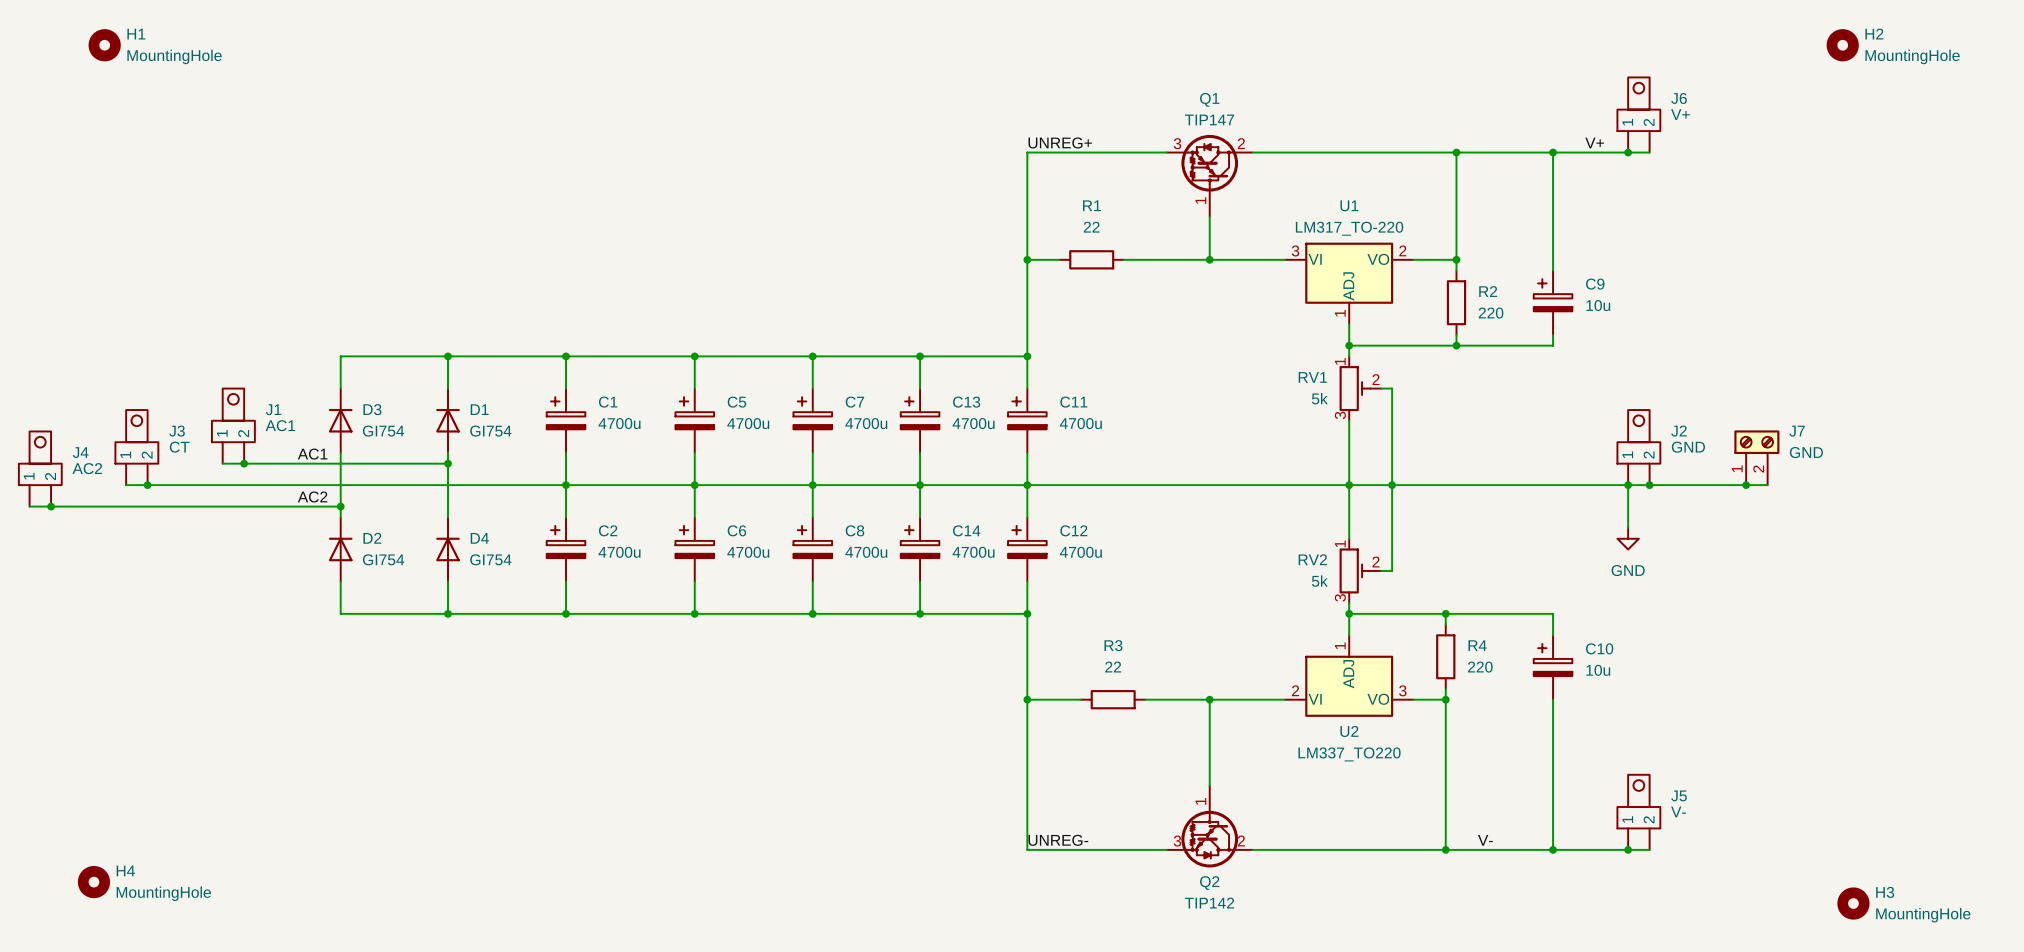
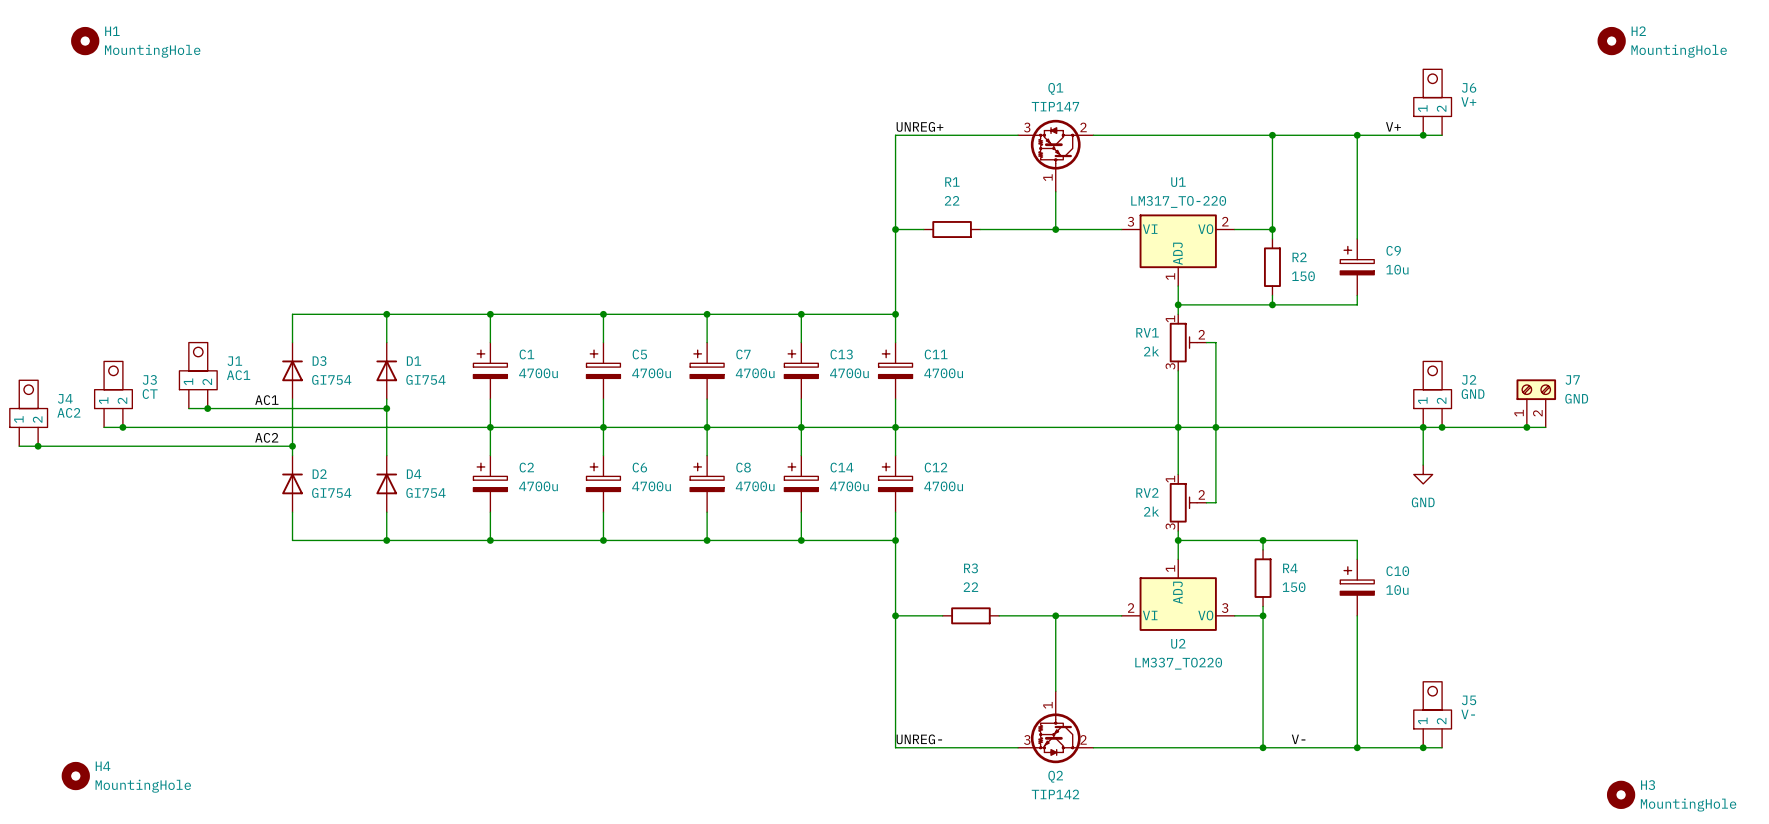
R2 value: 220 (1491, 313) -> 150 (1303, 276)
RV1 value: 5k (1319, 398) -> 2k (1151, 351)
RV2 value: 5k (1319, 581) -> 2k (1151, 511)
R4 value: 220 (1480, 667) -> 150 (1294, 587)

